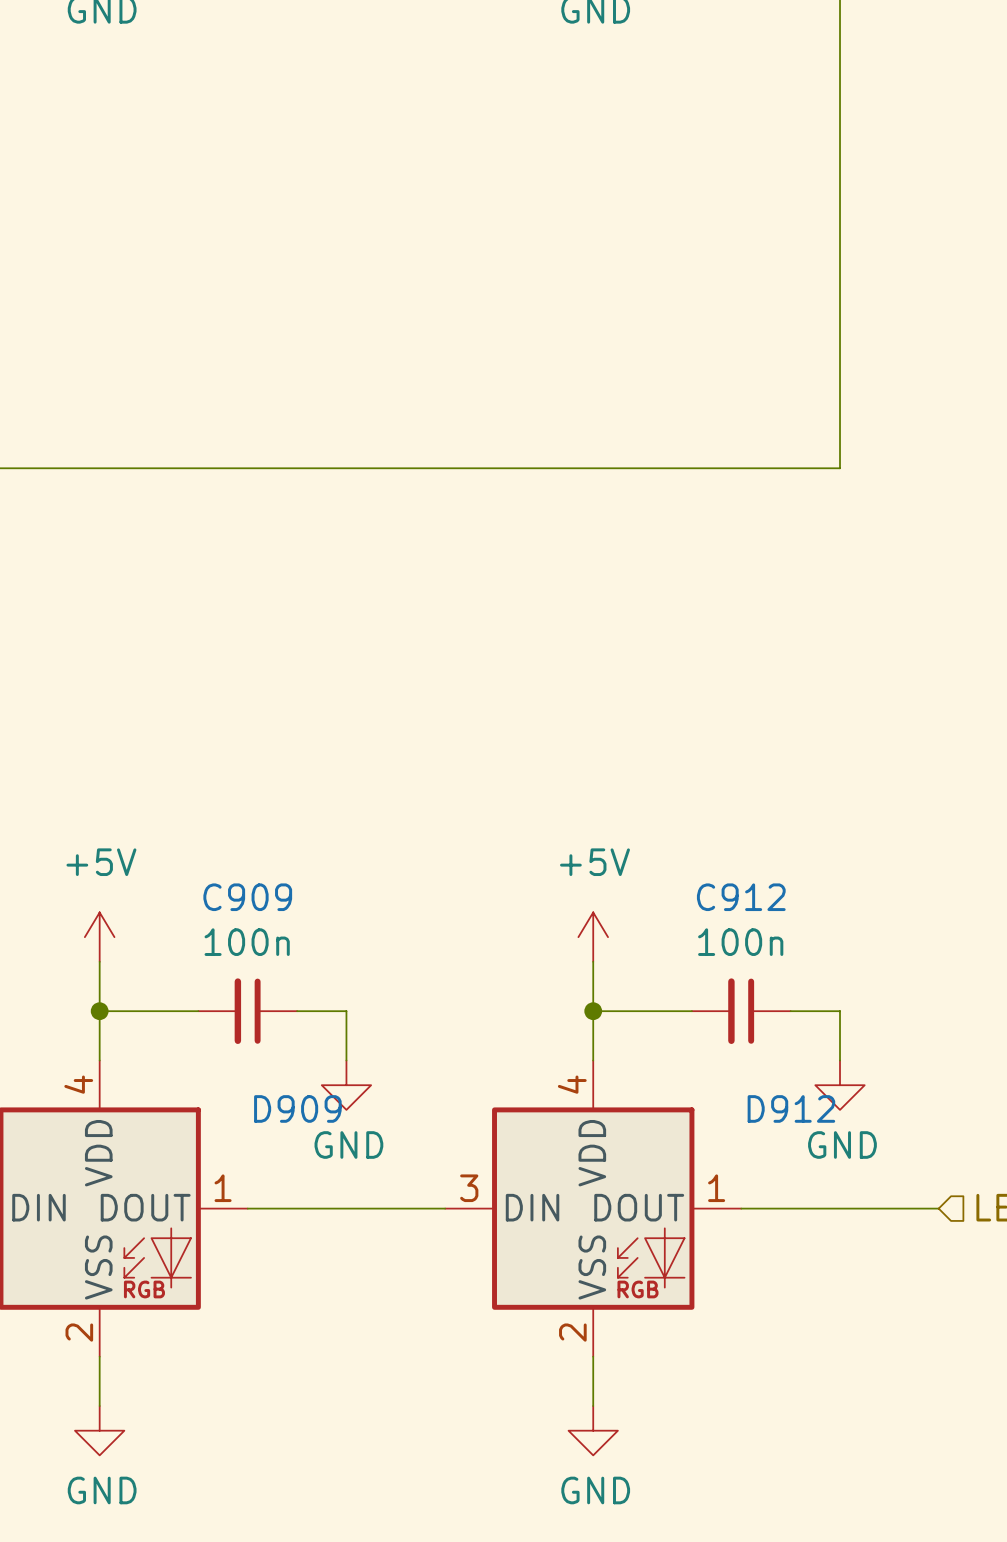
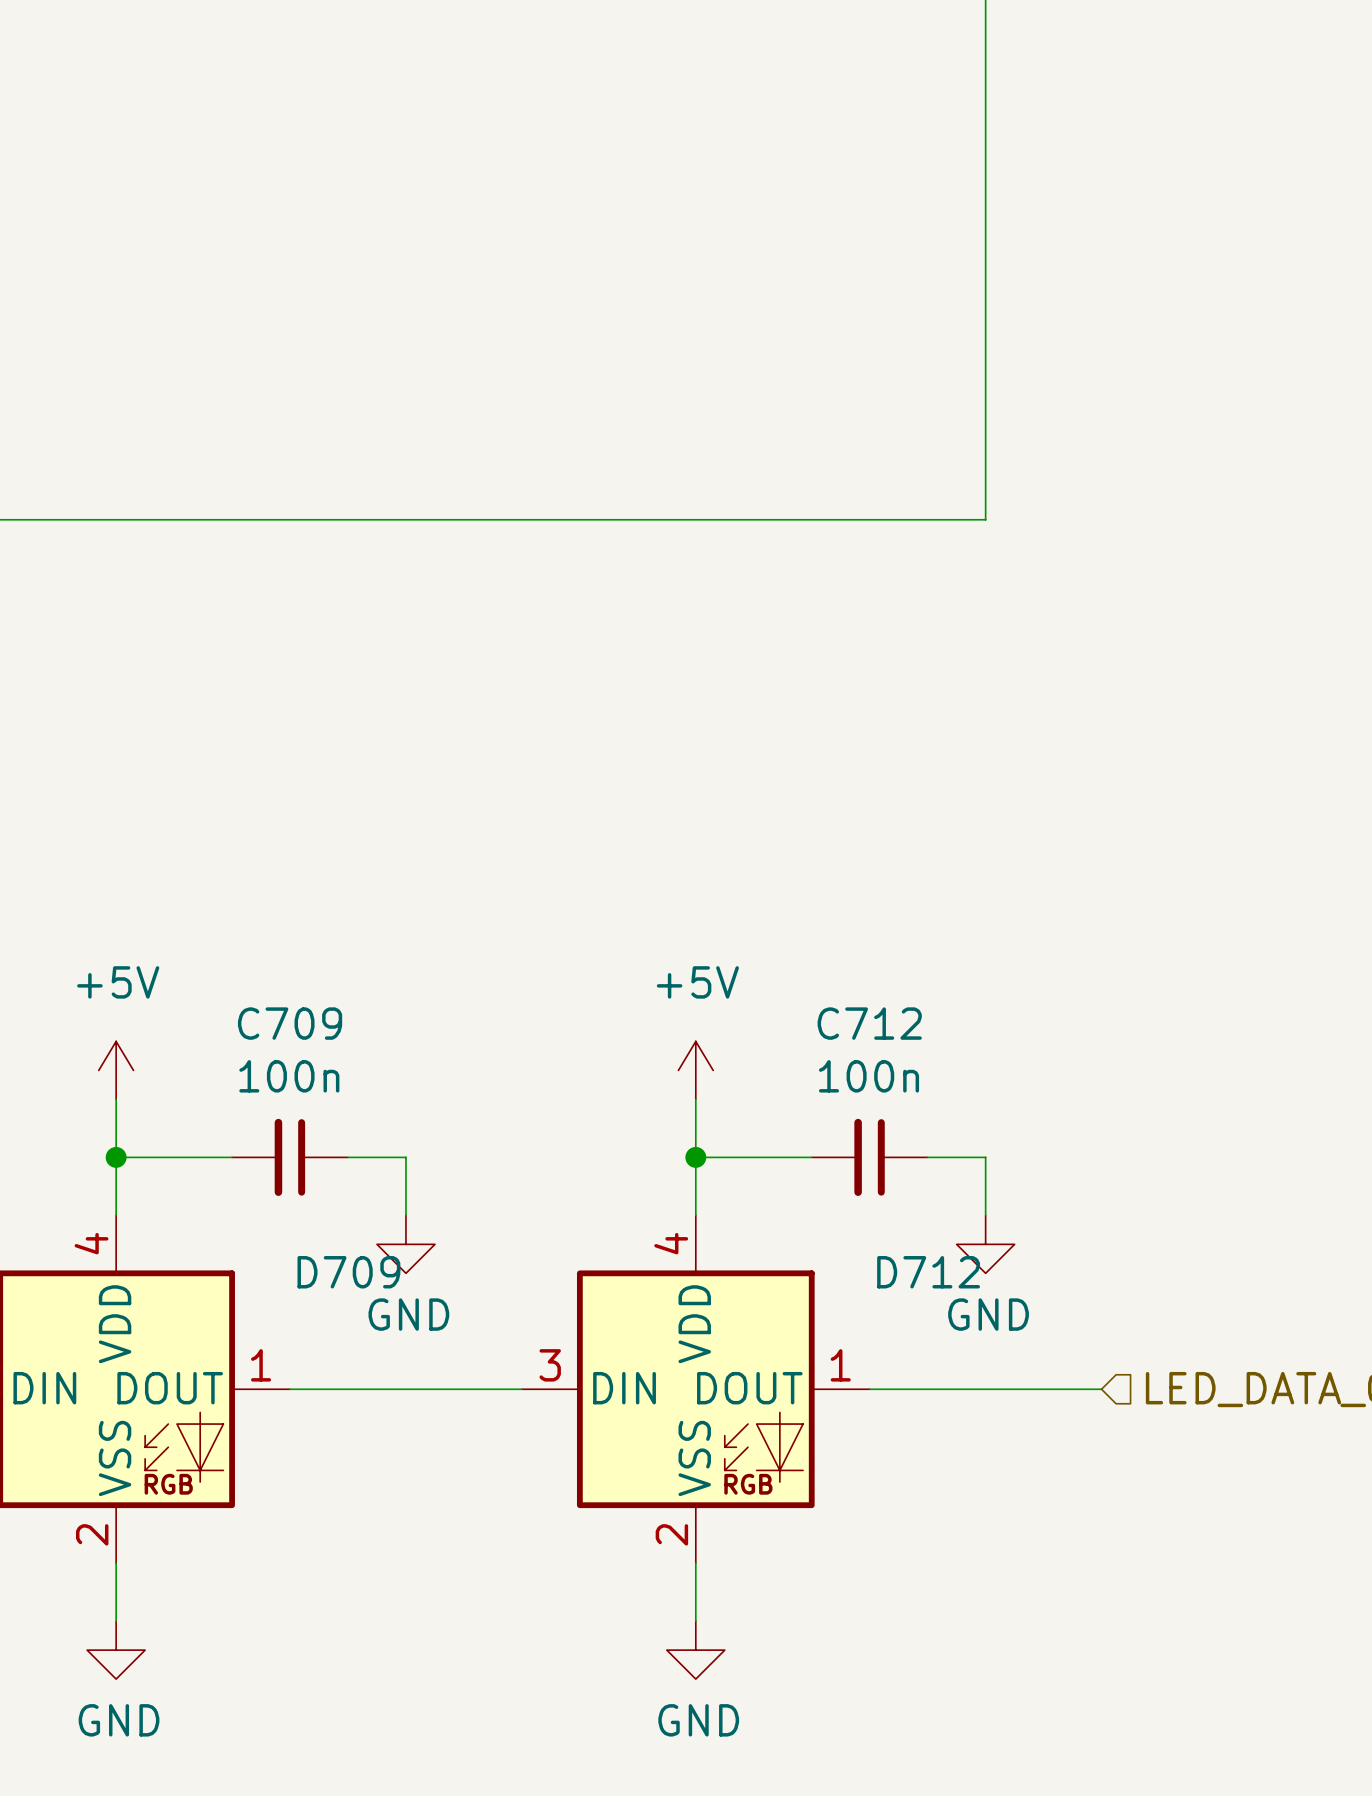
C909 name: C909 (247, 897) -> C709 (290, 1023)
C912 name: C912 (741, 897) -> C712 (869, 1023)
D909 name: D909 (297, 1108) -> D709 (348, 1272)
D912 name: D912 (791, 1108) -> D712 (928, 1272)

